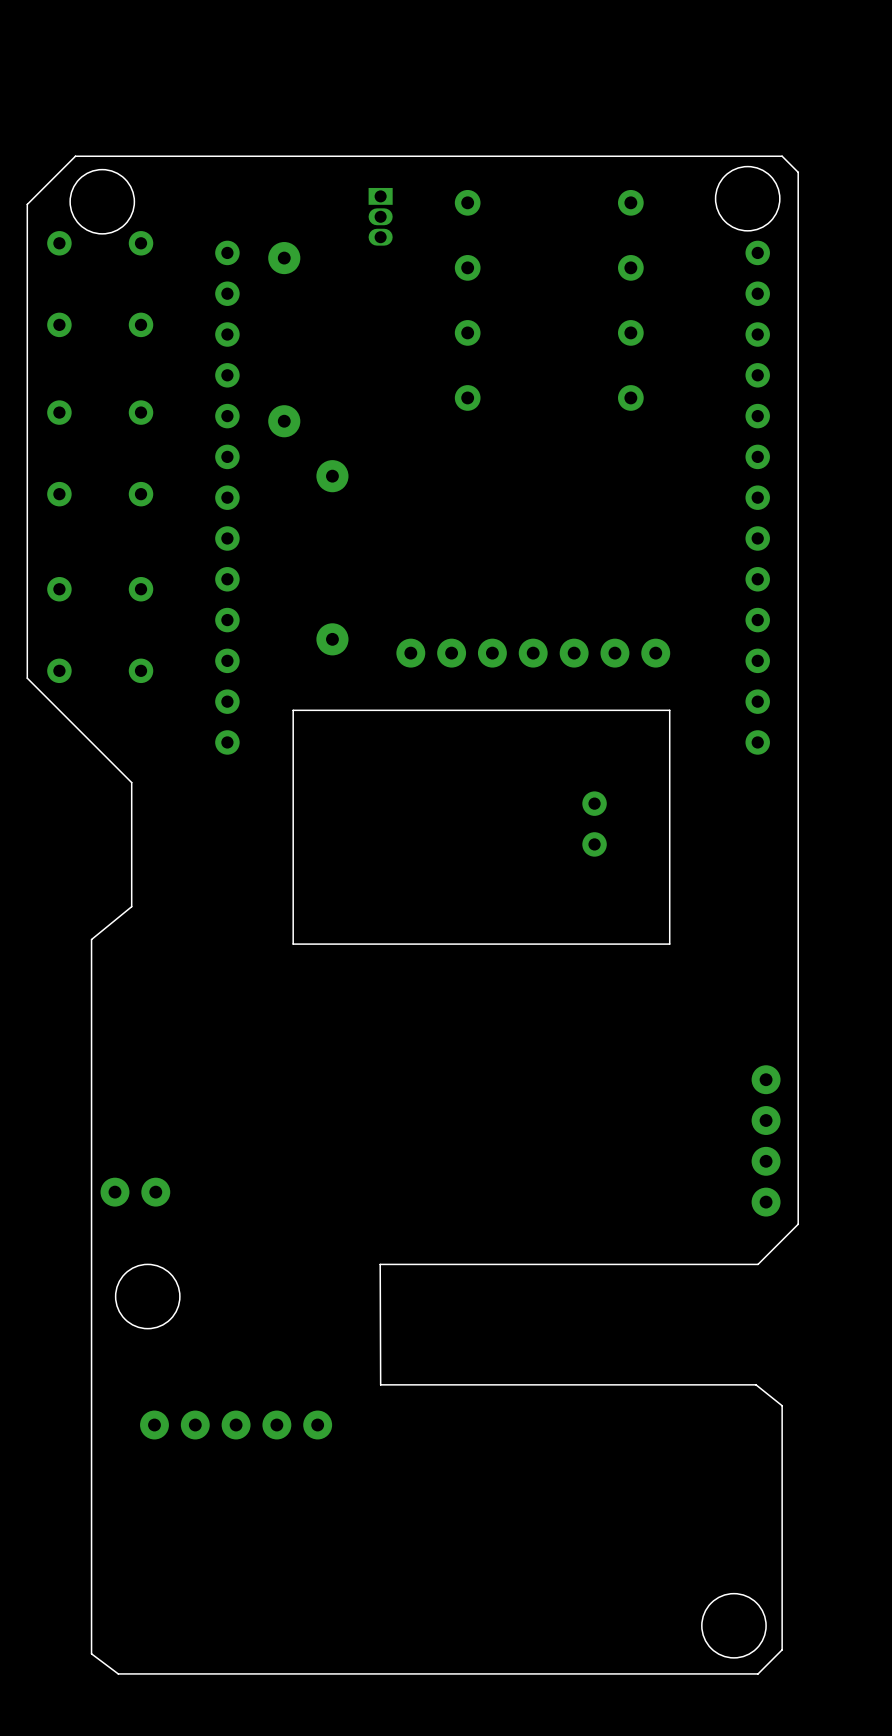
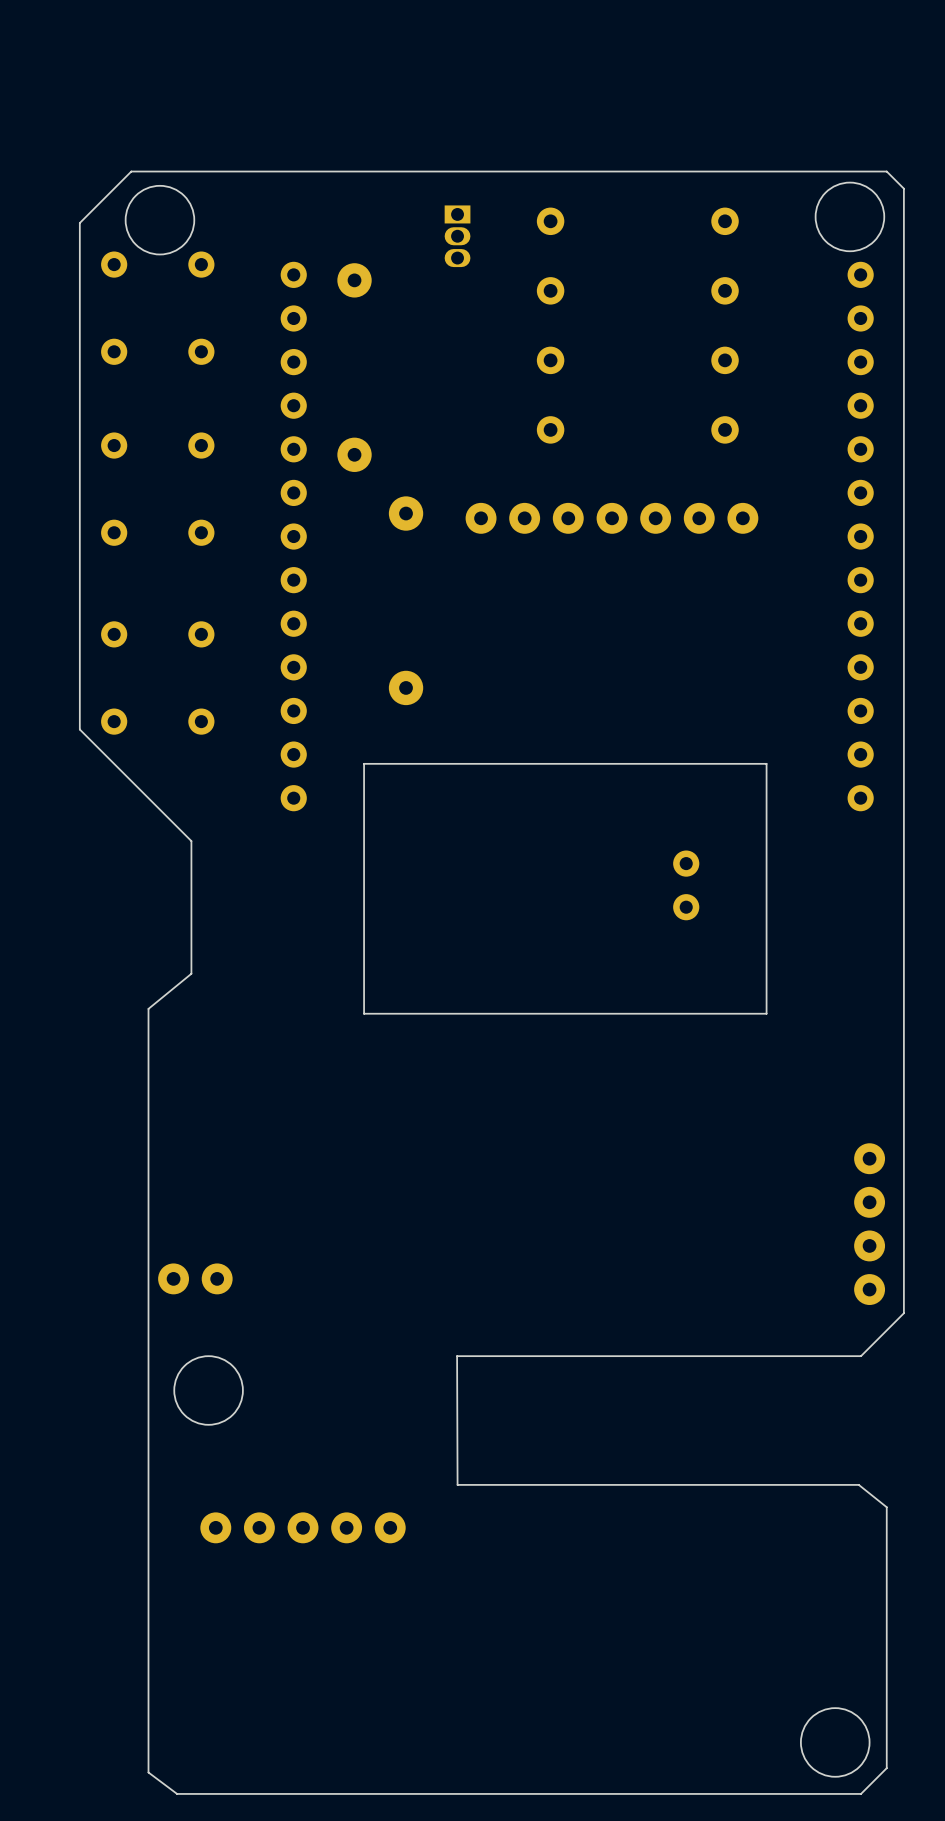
part position: (533, 653) -> (611, 518)

